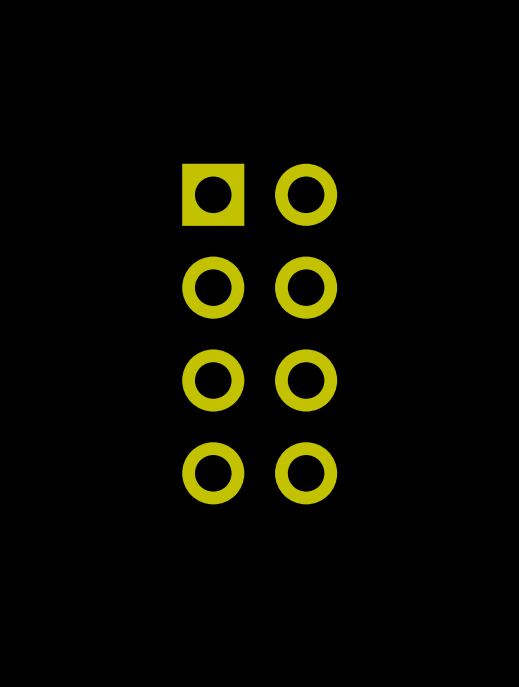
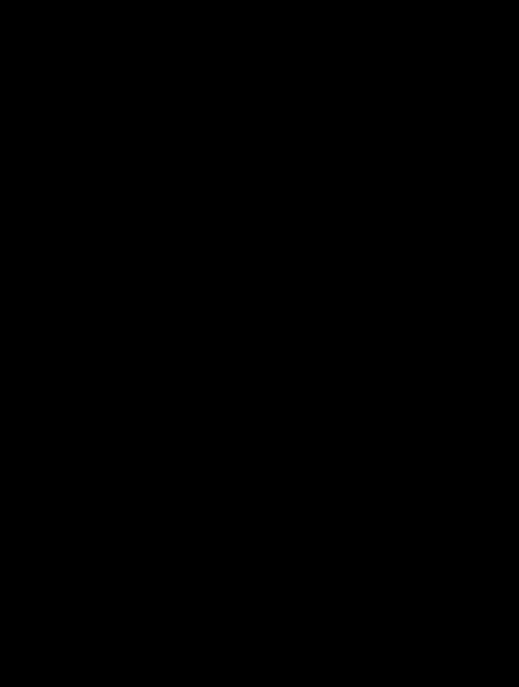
part: (259, 334) -> none

